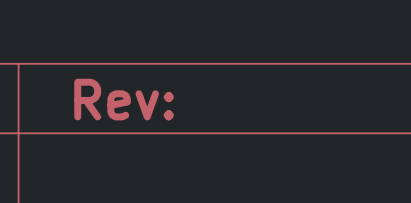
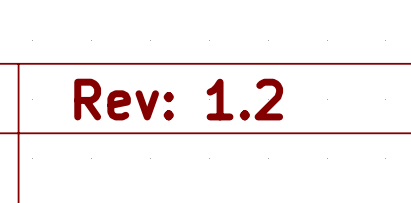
title block: Rev: (124, 99) -> Rev: 1.2 (178, 99)

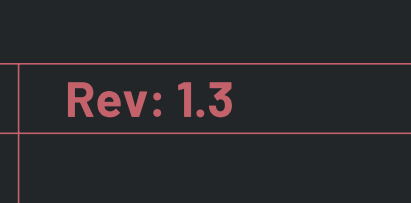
title block: Rev: 1.2 (178, 99) -> Rev: 1.3 (149, 99)

